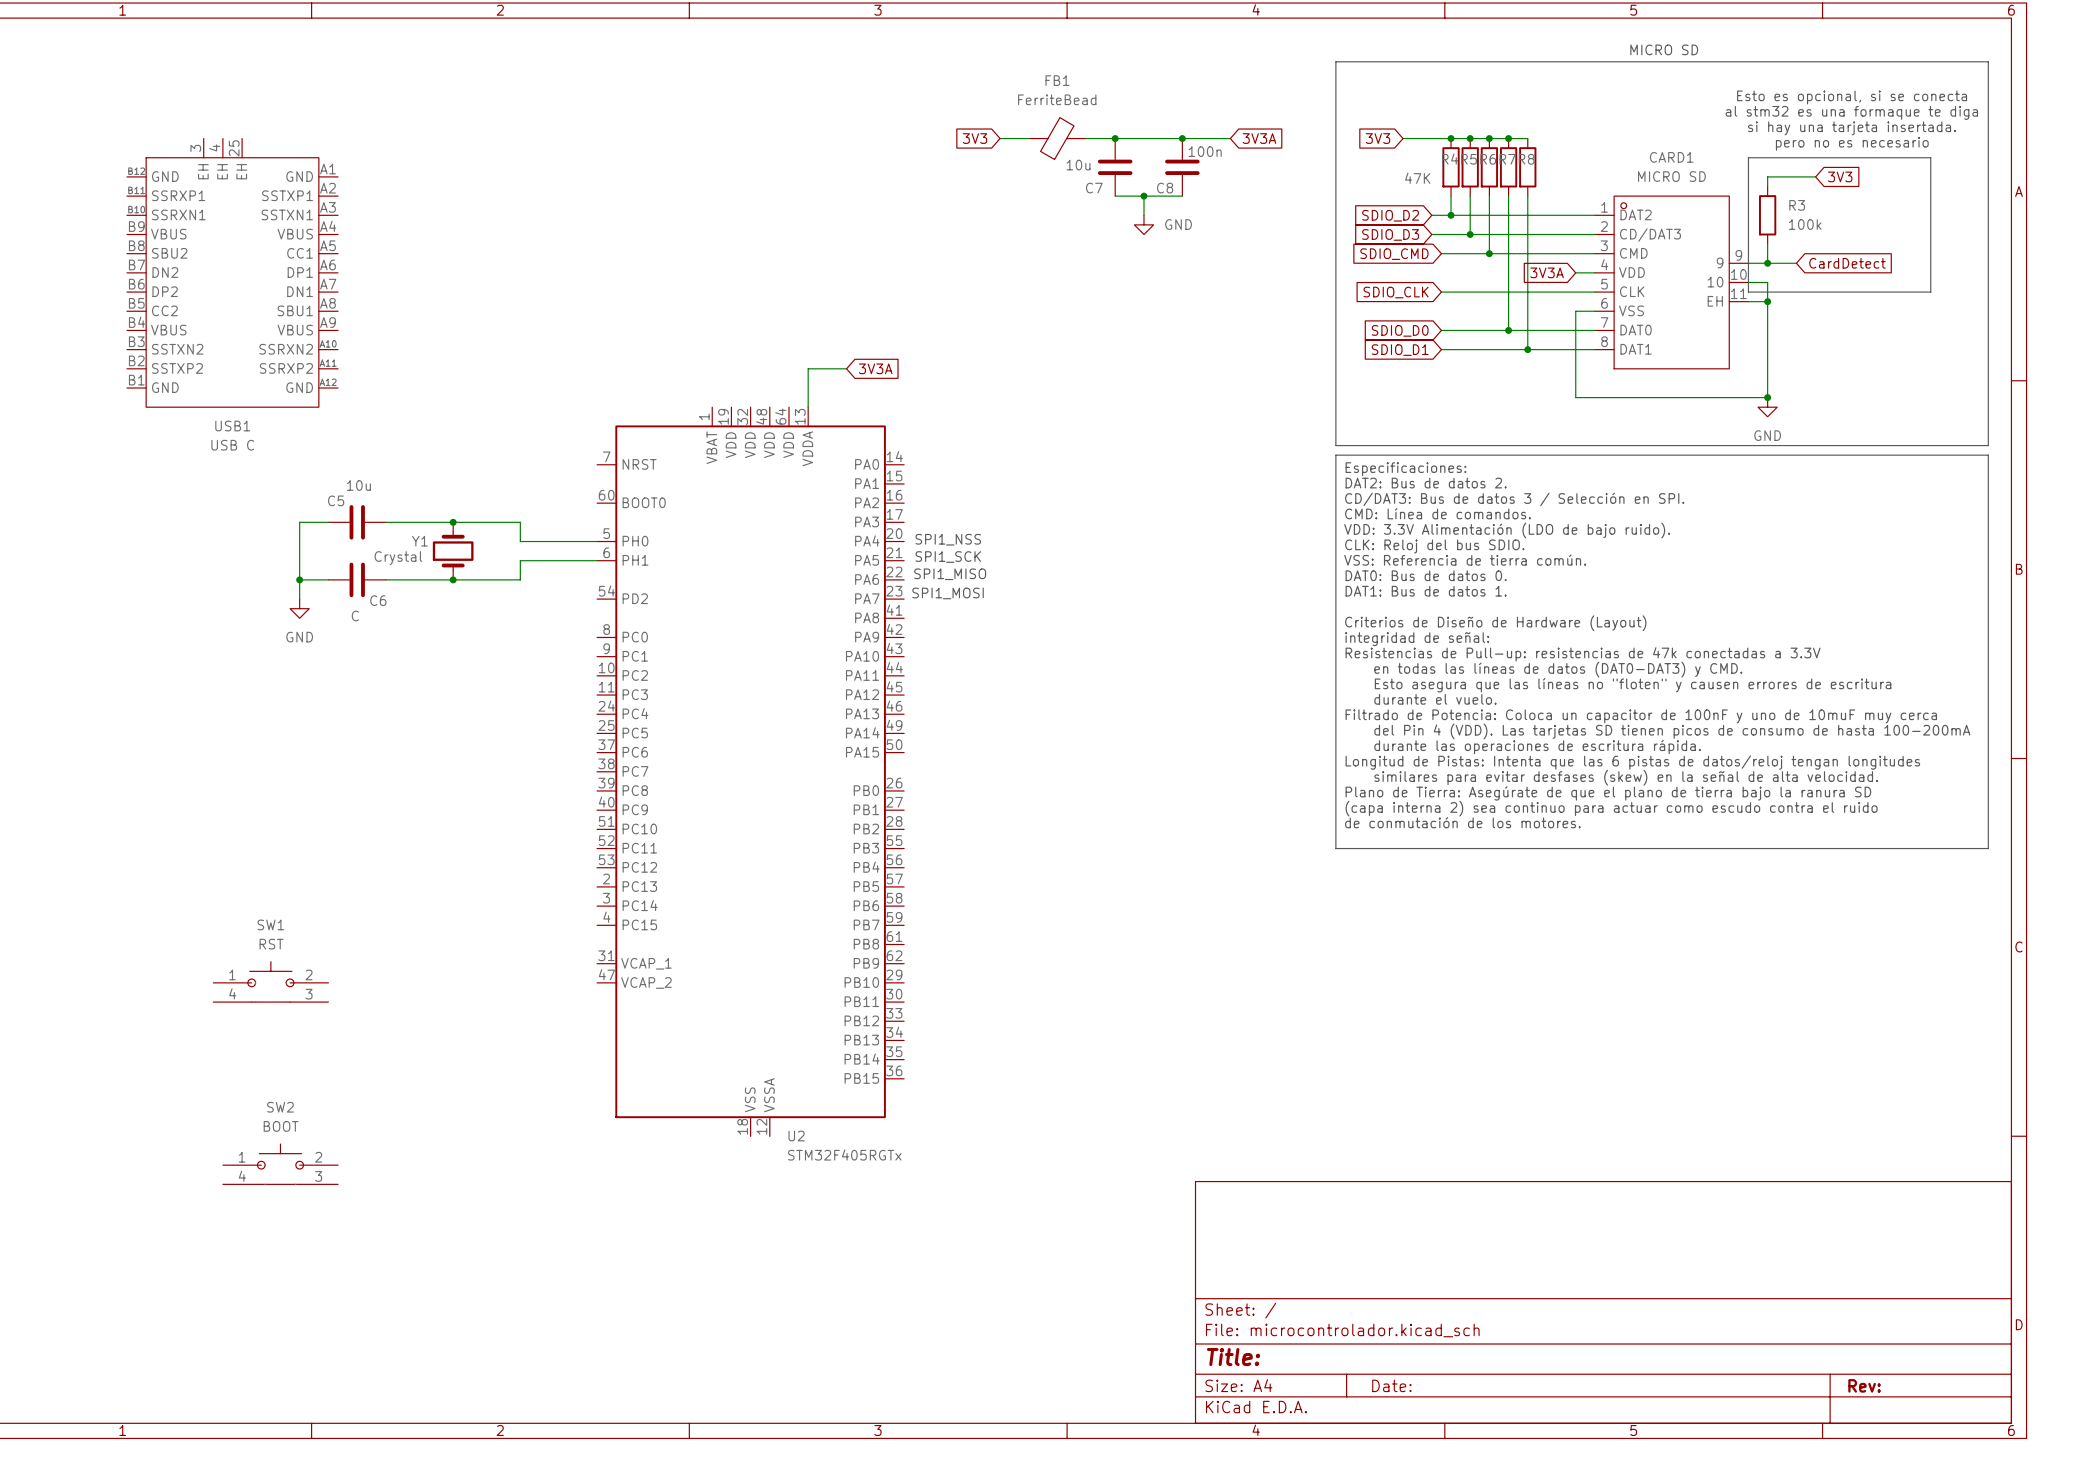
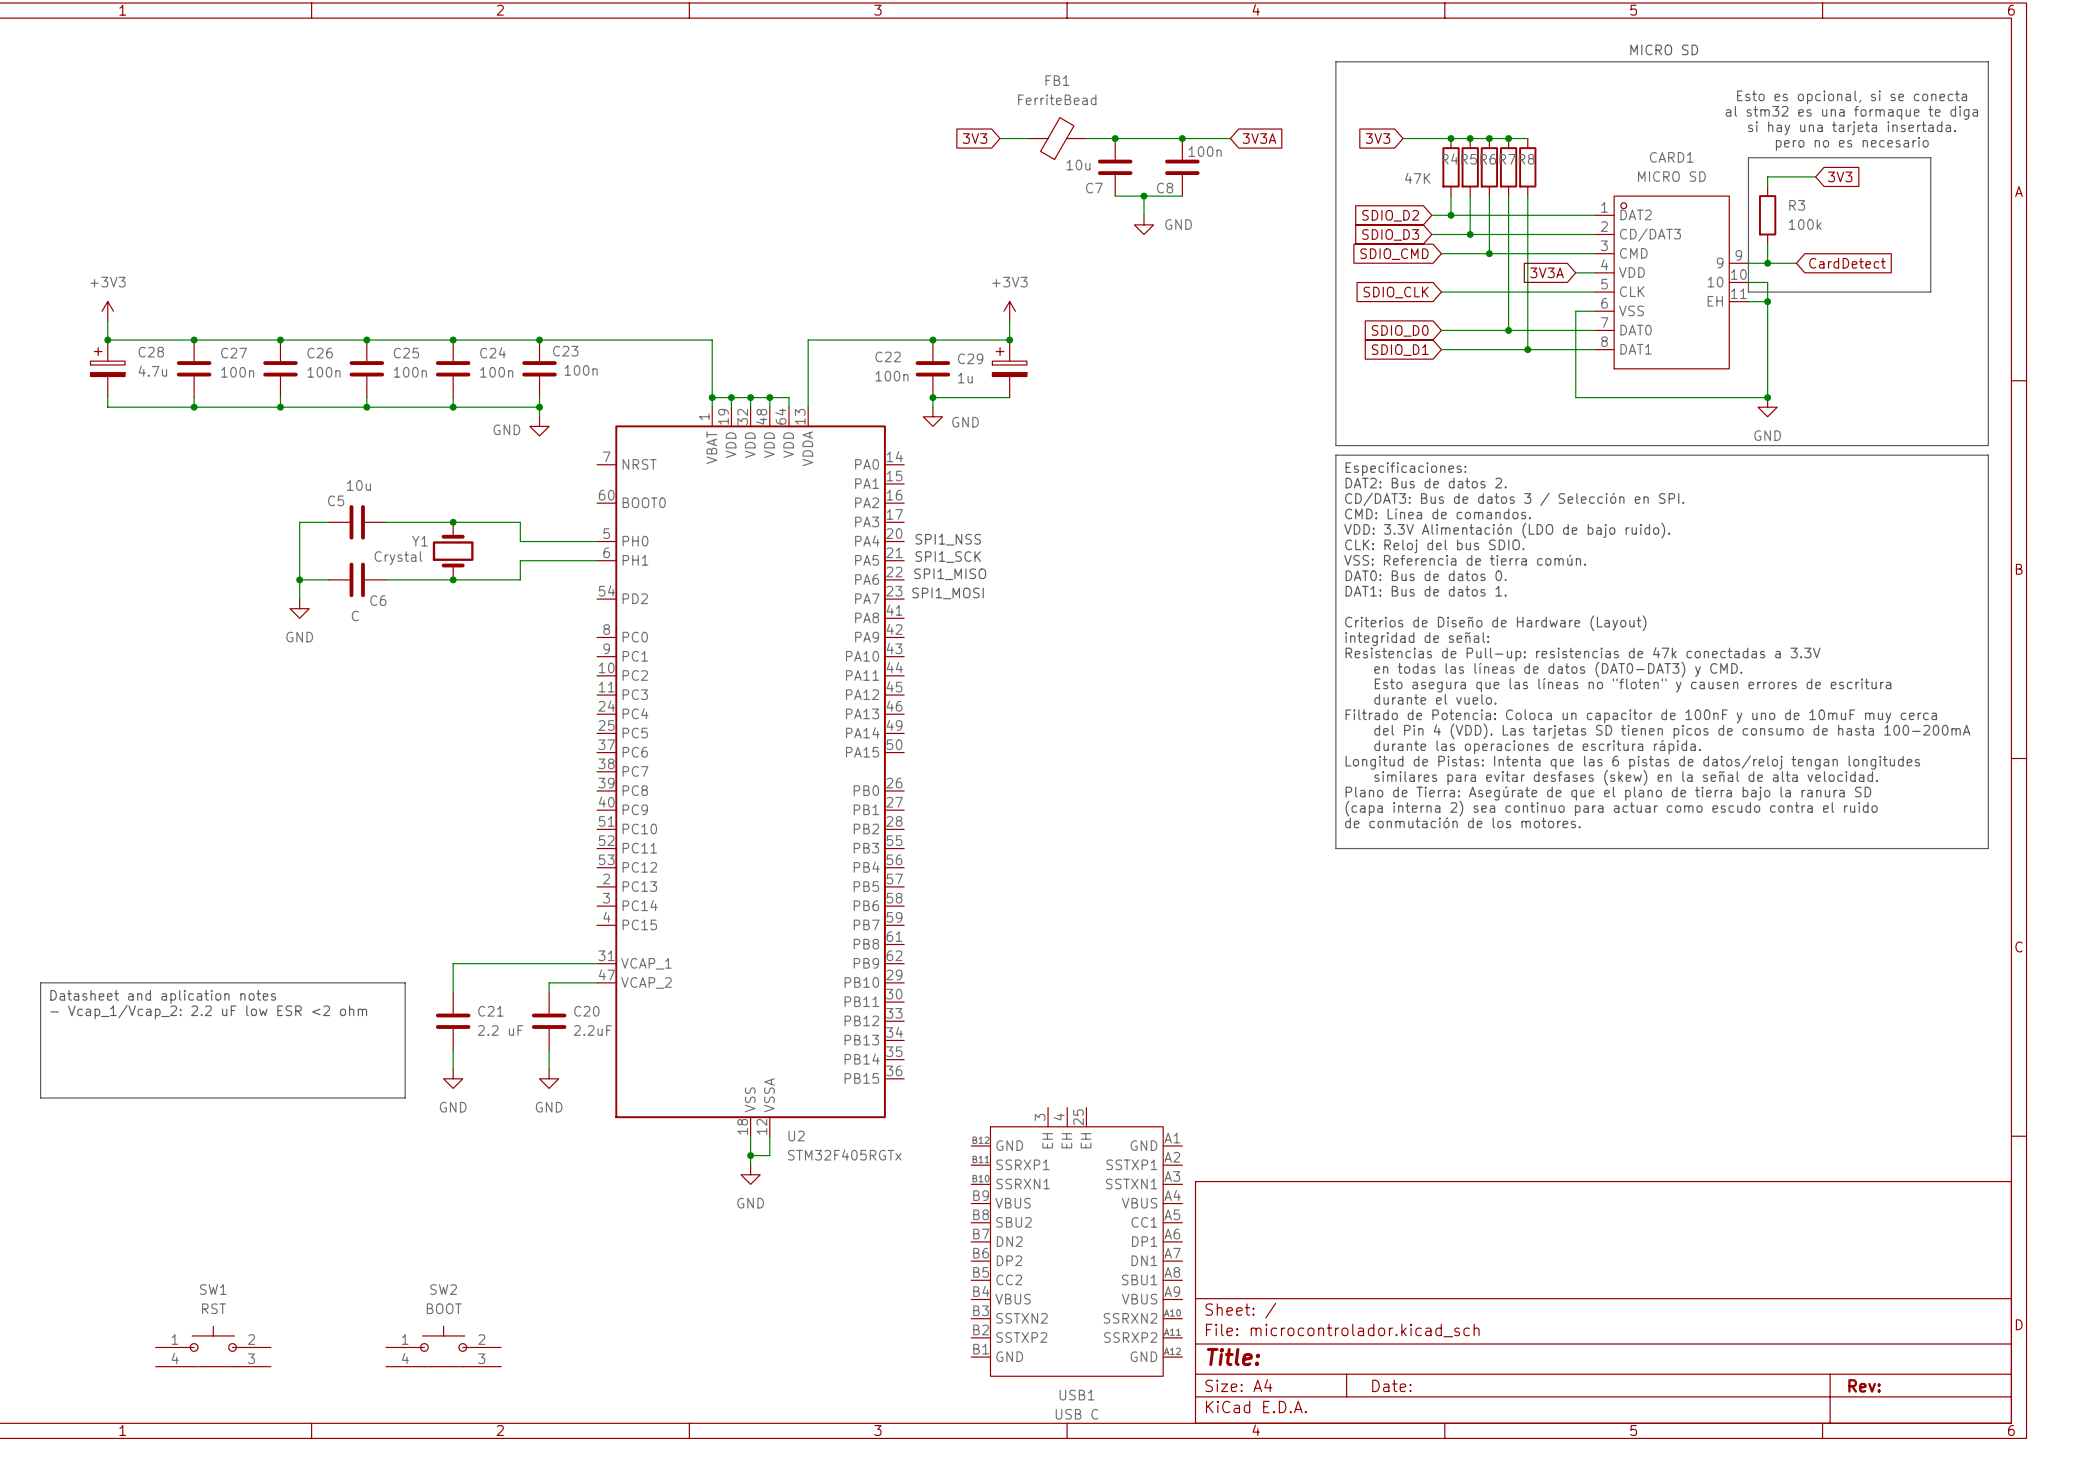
USB1 position: (232, 272) -> (1076, 1241)
power symbol: none -> +3V3 (107, 311)
power symbol: none -> +3V3 (1009, 311)
wire: none -> (107, 320) (107, 340) (712, 340) (712, 407)
junction: none -> (107, 340)
junction: none -> (194, 340)
junction: none -> (280, 340)
junction: none -> (366, 340)
junction: none -> (453, 340)
junction: none -> (539, 340)
junction: none -> (932, 340)
junction: none -> (1009, 340)
C28: none -> 4.7u (107, 368)
C27: none -> 100n (194, 368)
C26: none -> 100n (280, 368)
C25: none -> 100n (366, 368)
C24: none -> 100n (453, 368)
C23: none -> 100n (539, 368)
wire: (808, 368) (846, 368) -> (808, 368) (808, 340) (1009, 340) (1009, 320)
global label: 3V3A (875, 368) -> none
C22: none -> 100n (932, 368)
C29: none -> 1u (1009, 368)
wire: none -> (107, 397) (107, 407) (539, 407)
wire: none -> (194, 397) (194, 407)
wire: none -> (280, 397) (280, 407)
wire: none -> (366, 397) (366, 407)
wire: none -> (453, 397) (453, 407)
wire: none -> (539, 397) (539, 416)
wire: none -> (712, 397) (788, 397) (788, 407)
junction: none -> (712, 397)
wire: none -> (731, 397) (731, 407)
junction: none -> (731, 397)
wire: none -> (750, 397) (750, 407)
junction: none -> (750, 397)
wire: none -> (769, 397) (769, 407)
junction: none -> (769, 397)
junction: none -> (932, 397)
wire: none -> (1009, 397) (932, 397) (932, 407)
junction: none -> (194, 407)
junction: none -> (280, 407)
junction: none -> (366, 407)
junction: none -> (453, 407)
junction: none -> (539, 407)
power symbol: none -> GND (932, 416)
power symbol: none -> GND (539, 426)
wire: none -> (597, 963) (453, 963) (453, 992)
SW1 position: (270, 981) -> (213, 1346)
line: none -> (40, 982) (405, 982) (405, 1098) (40, 1098) (40, 982)
wire: none -> (597, 982) (549, 982) (549, 992)
text: none -> Datasheet and aplication notes (163, 996)
text: none -> - Vcap_1/Vcap_2: 2.2 uF low ESR <2 ohm (208, 1012)
C21: none -> 2.2 uF (453, 1021)
C20: none -> 2.2uF (549, 1021)
wire: none -> (453, 1050) (453, 1069)
wire: none -> (549, 1050) (549, 1069)
power symbol: none -> GND (453, 1078)
power symbol: none -> GND (549, 1078)
wire: none -> (750, 1136) (750, 1165)
wire: none -> (769, 1136) (769, 1155) (750, 1155)
junction: none -> (750, 1155)
SW2 position: (280, 1164) -> (443, 1346)
power symbol: none -> GND (750, 1174)

